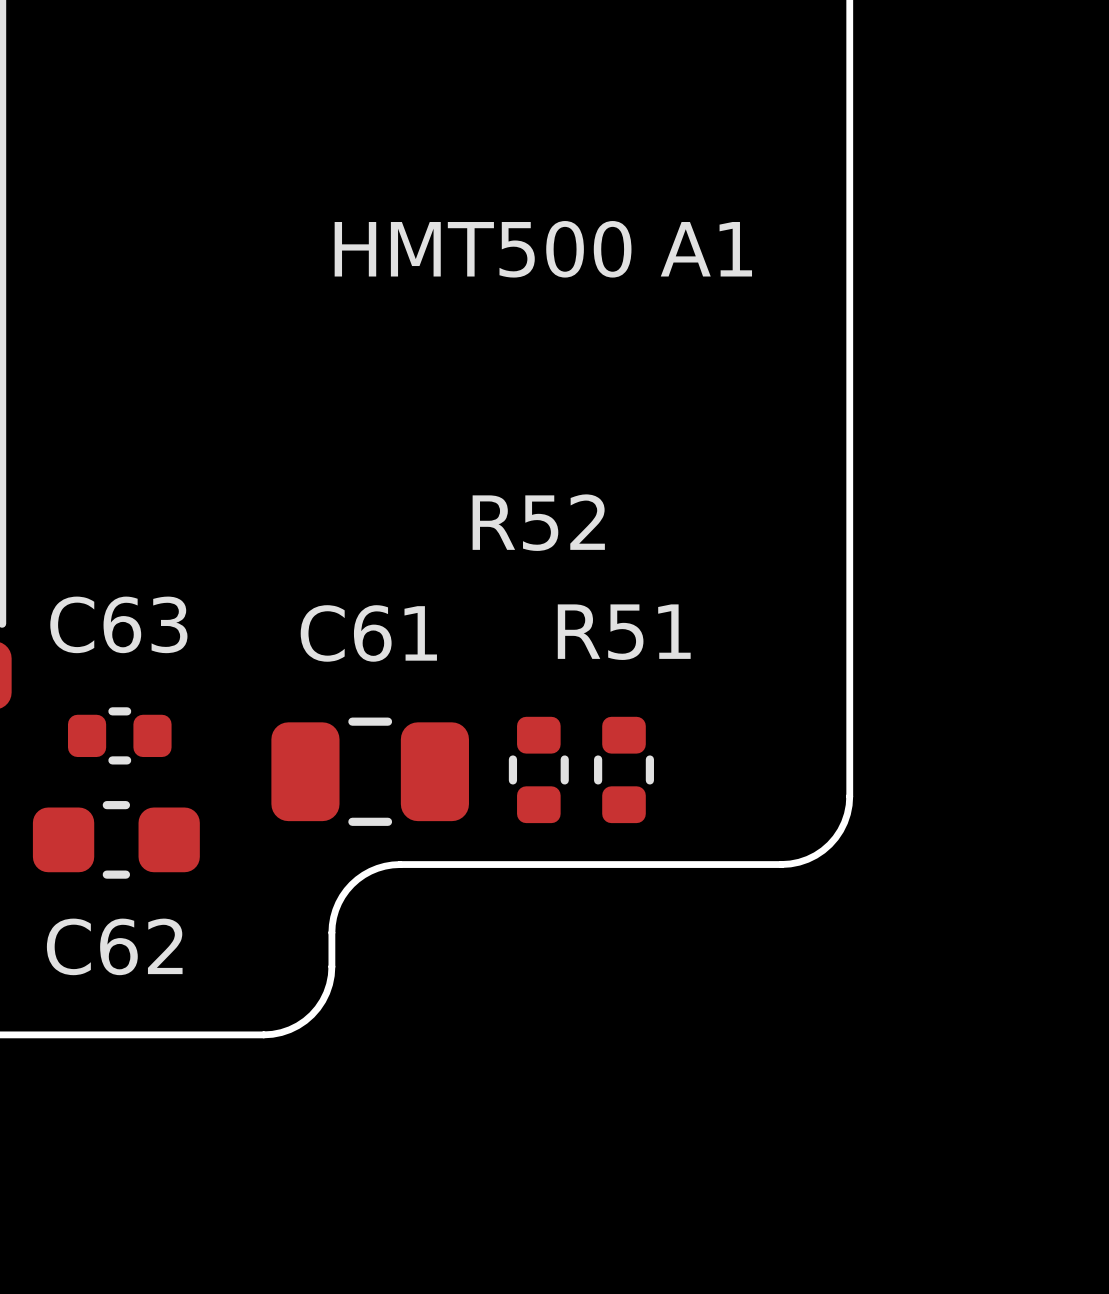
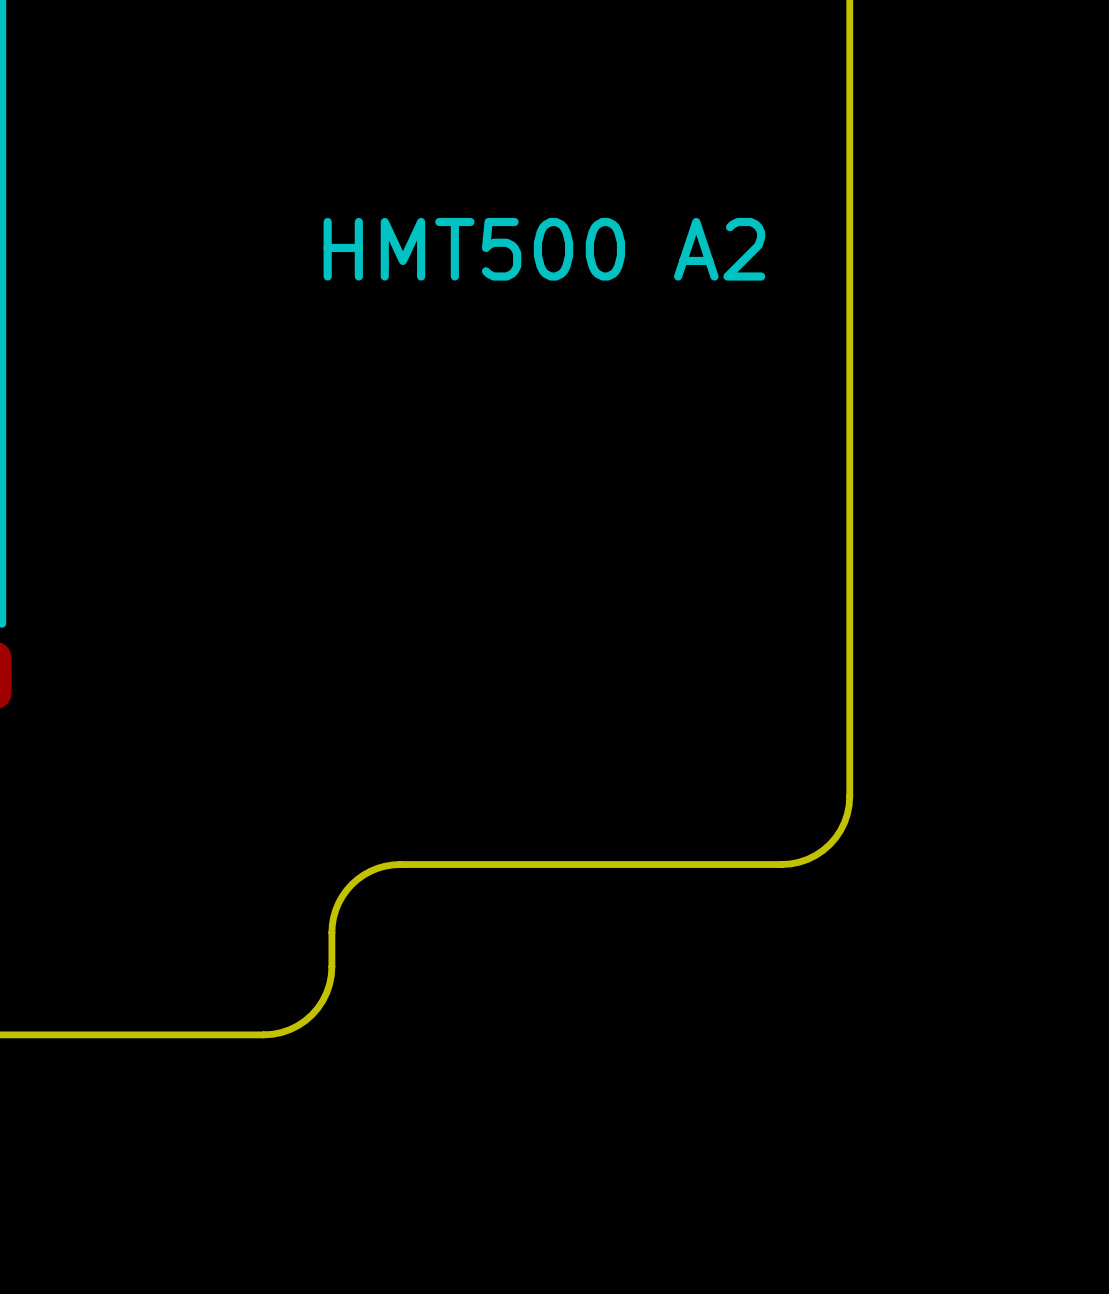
text: HMT500 A1 (543, 249) -> HMT500 A2 (544, 249)
C63: (119, 735) -> none
R52: (538, 769) -> none
R51: (624, 769) -> none
C61: (370, 771) -> none
C62: (116, 839) -> none

